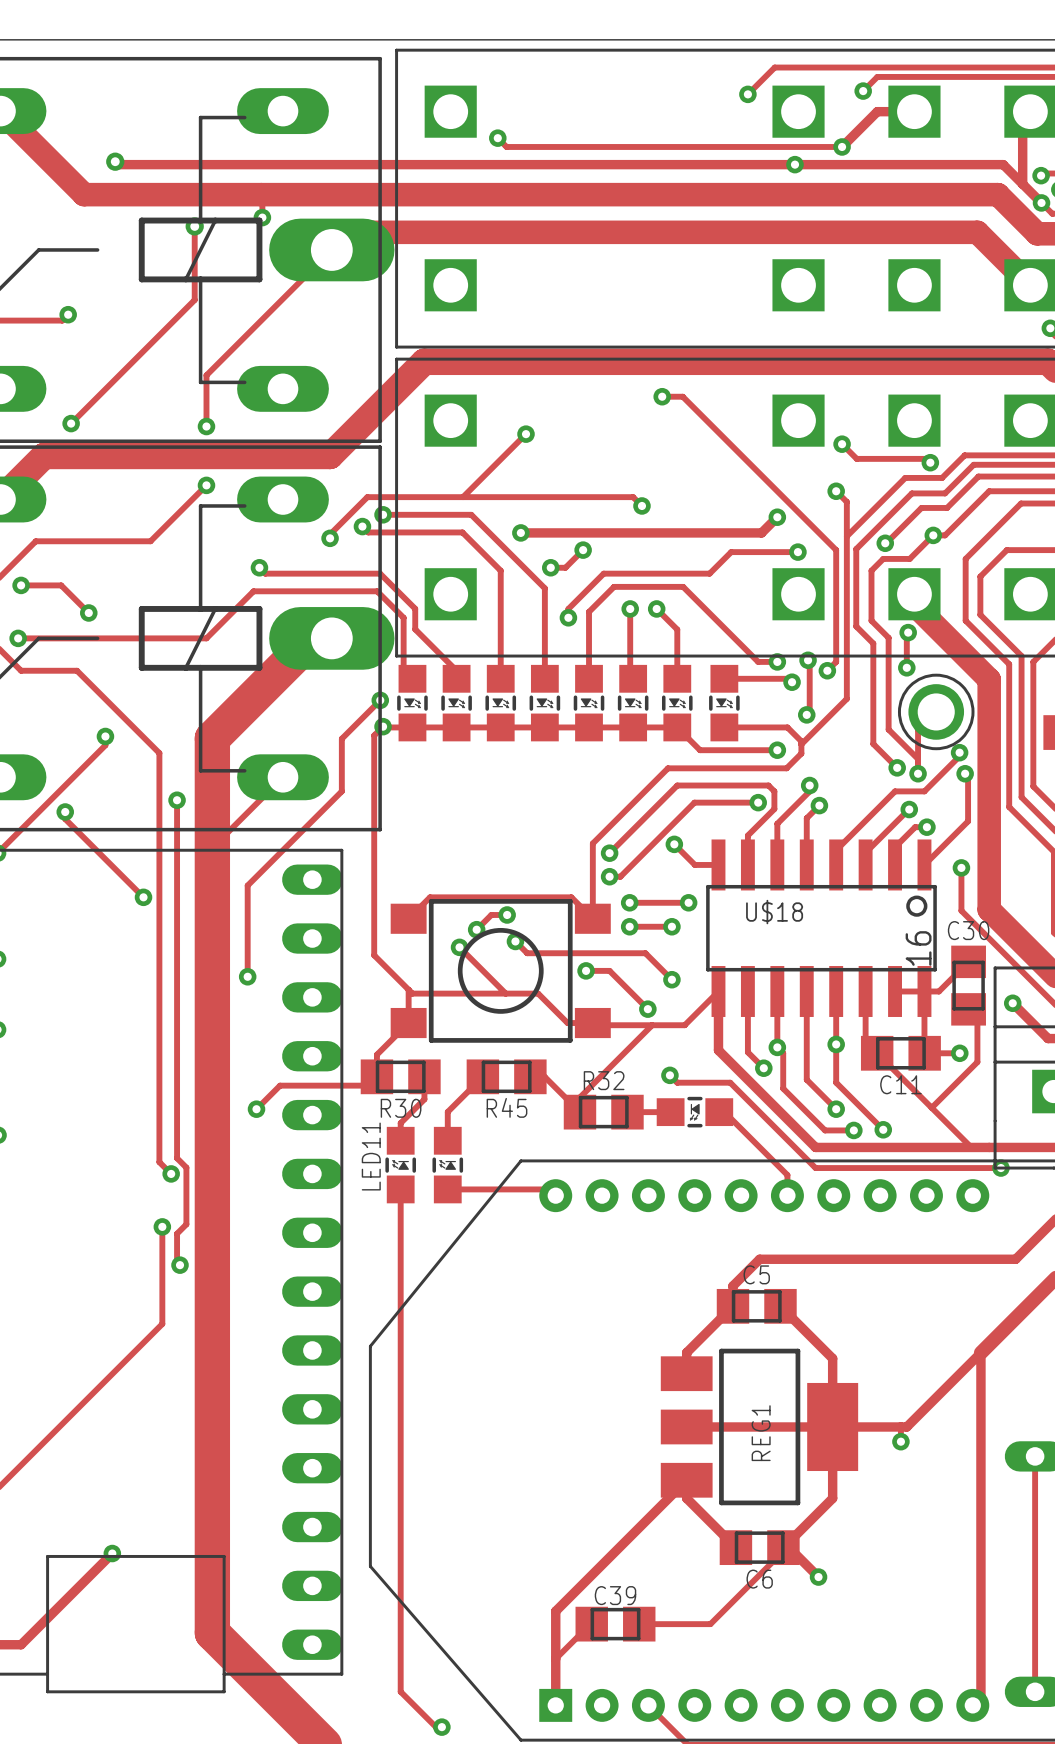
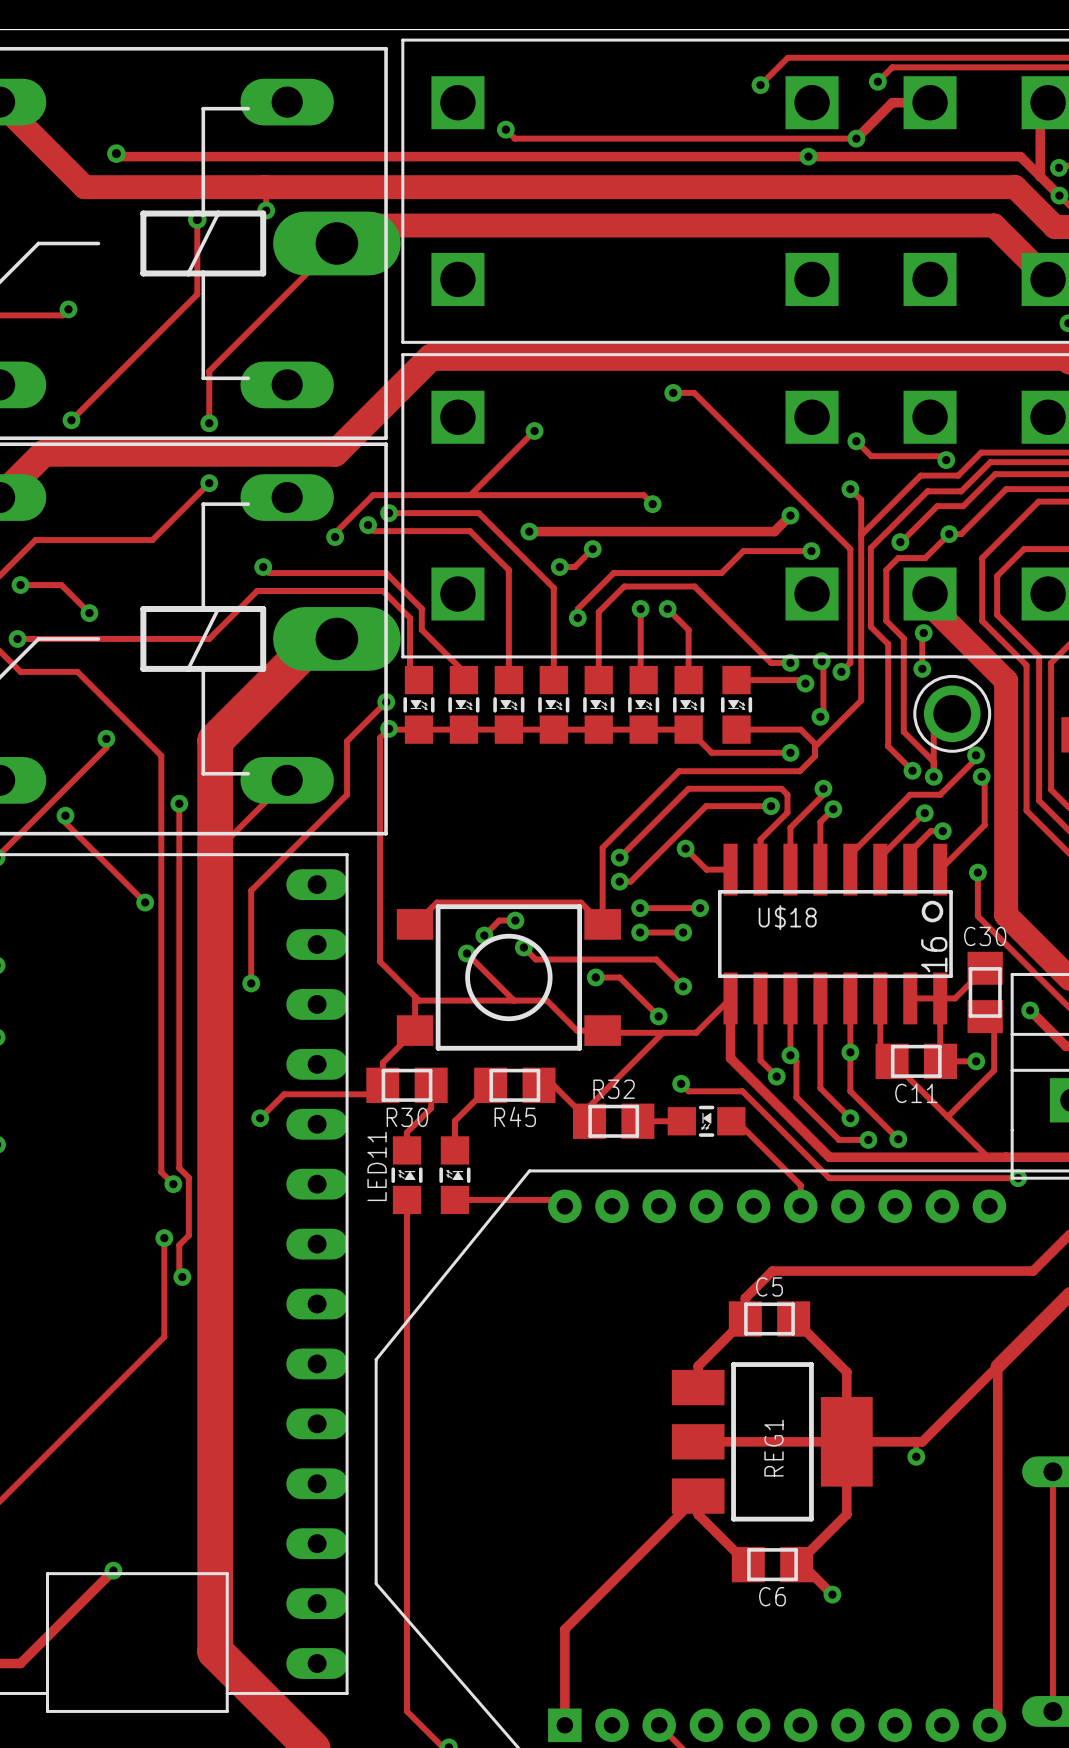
track: (783, 1547) (783, 1551) (710, 1624) (639, 1624) -> none
track: (591, 1624) (555, 1658) -> none
C39: (615, 1624) -> none

